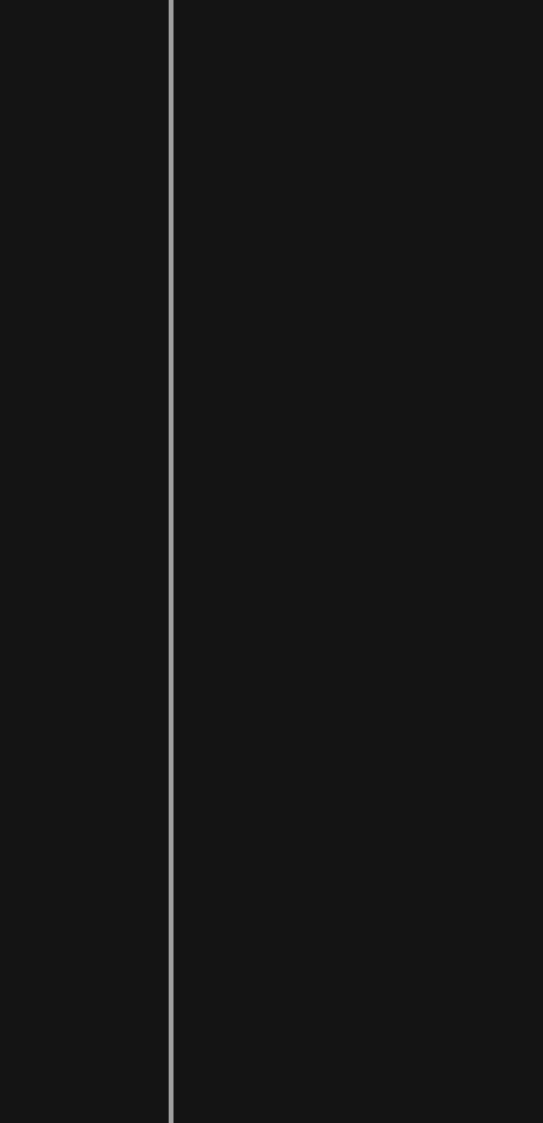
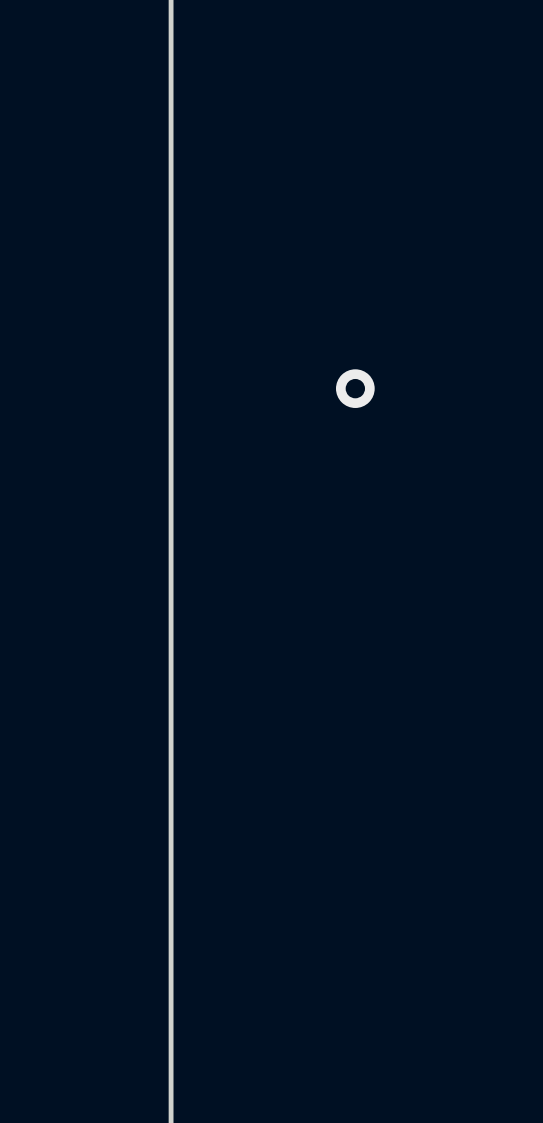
via: none -> (355, 388)

